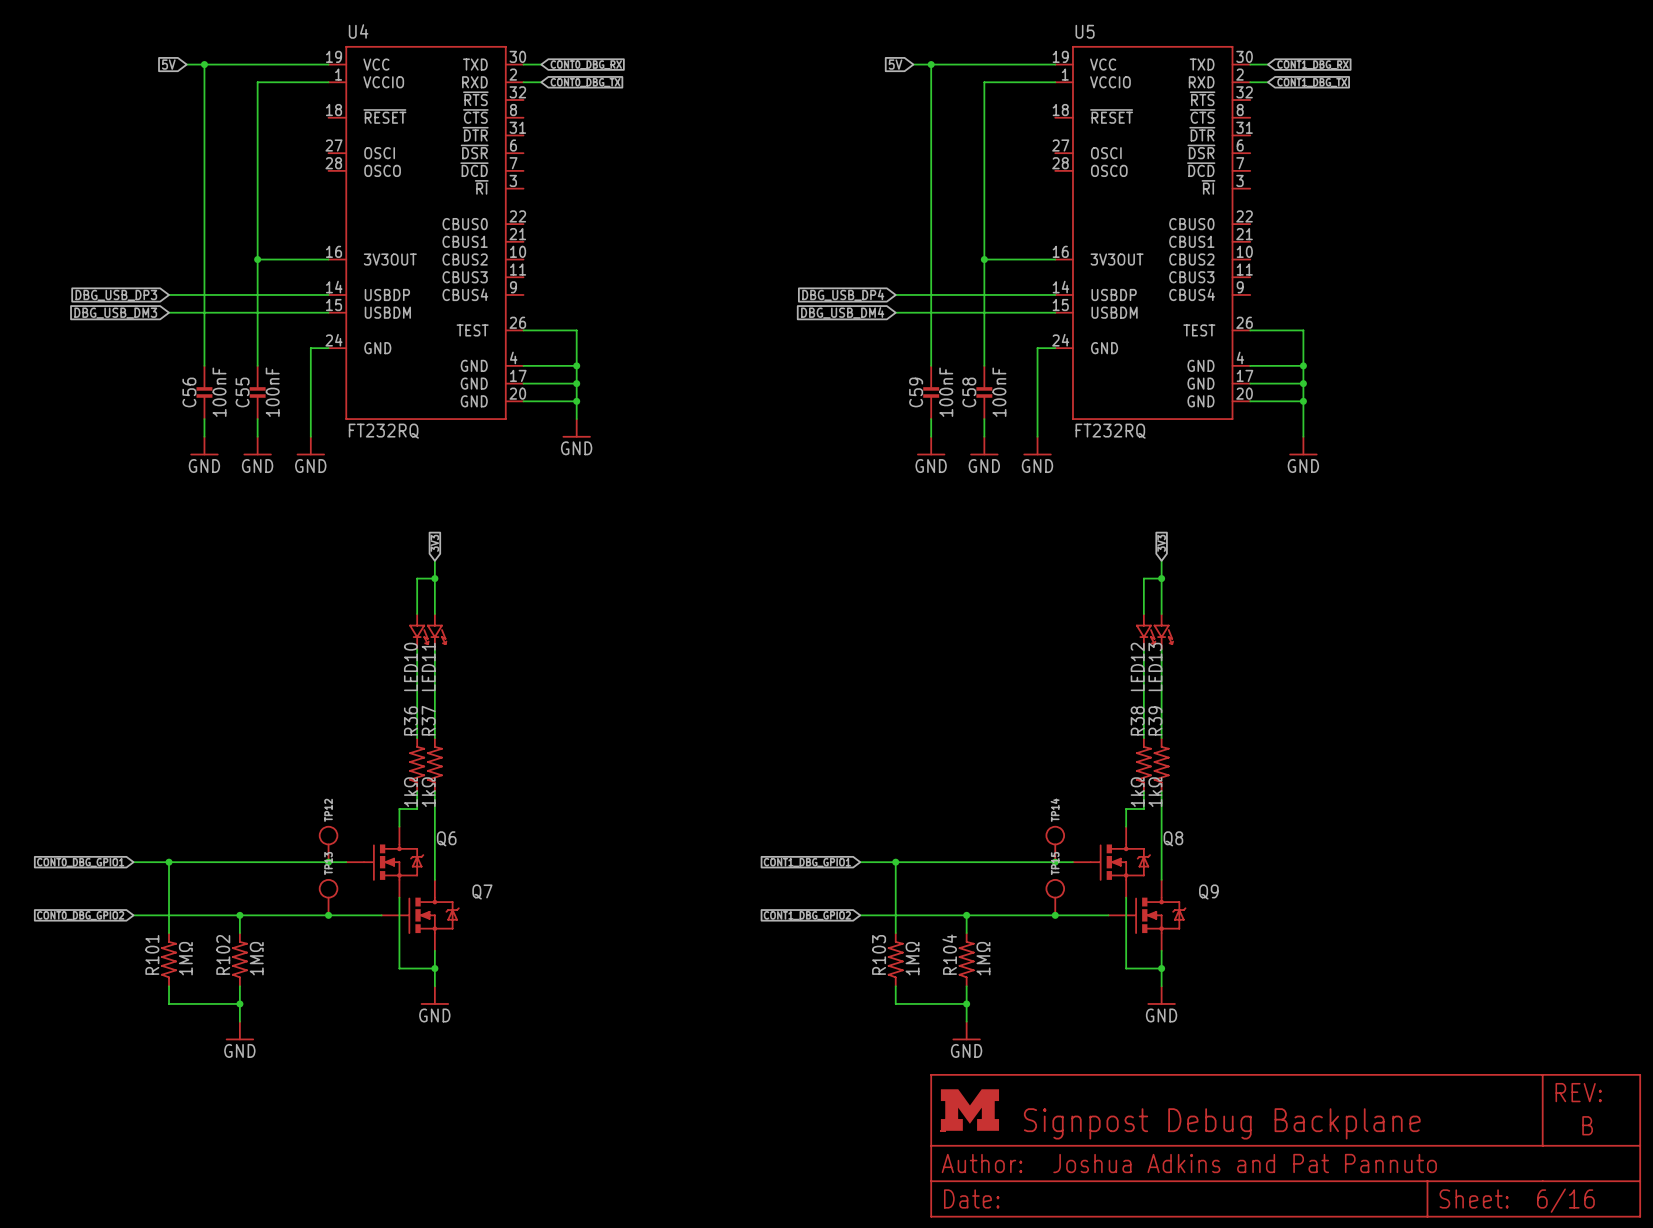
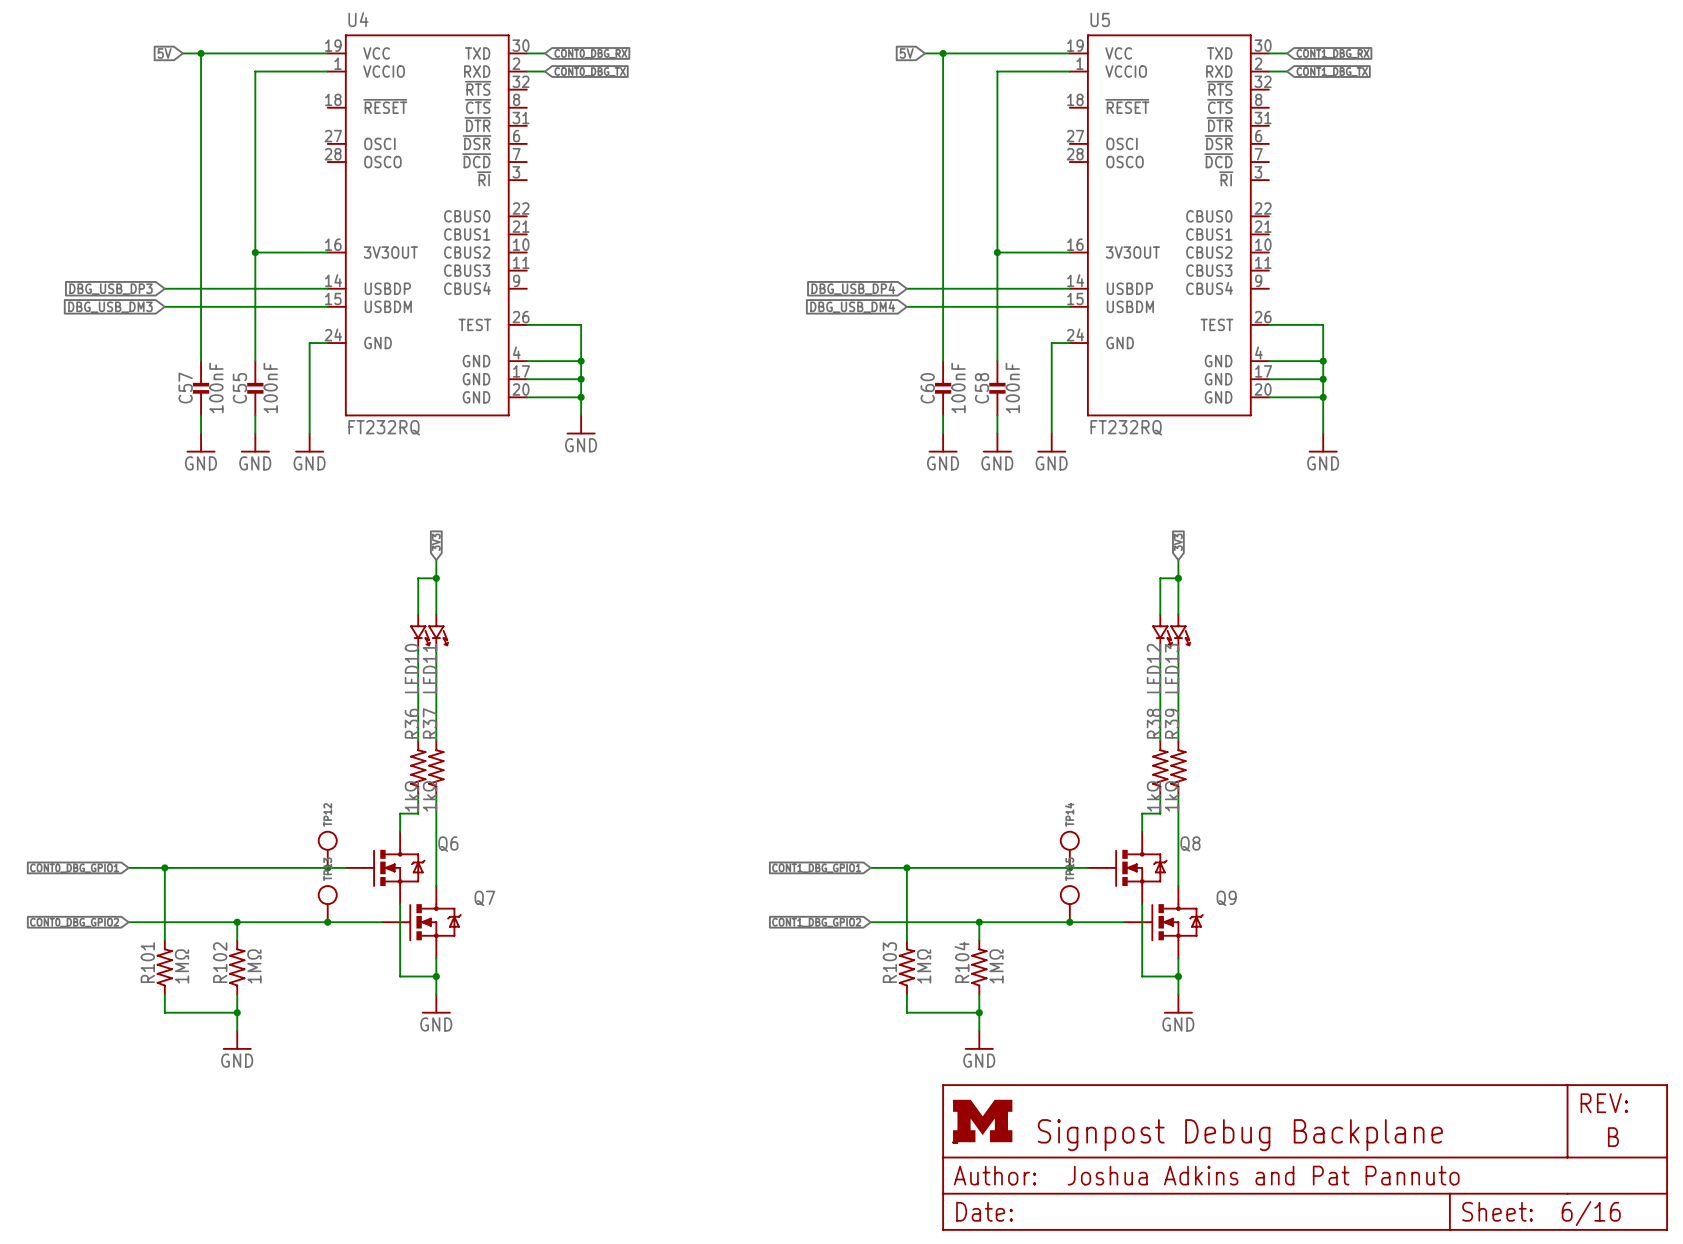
C56 name: C56 (189, 392) -> C57 (185, 388)
C59 name: C59 (916, 392) -> C60 (927, 388)

